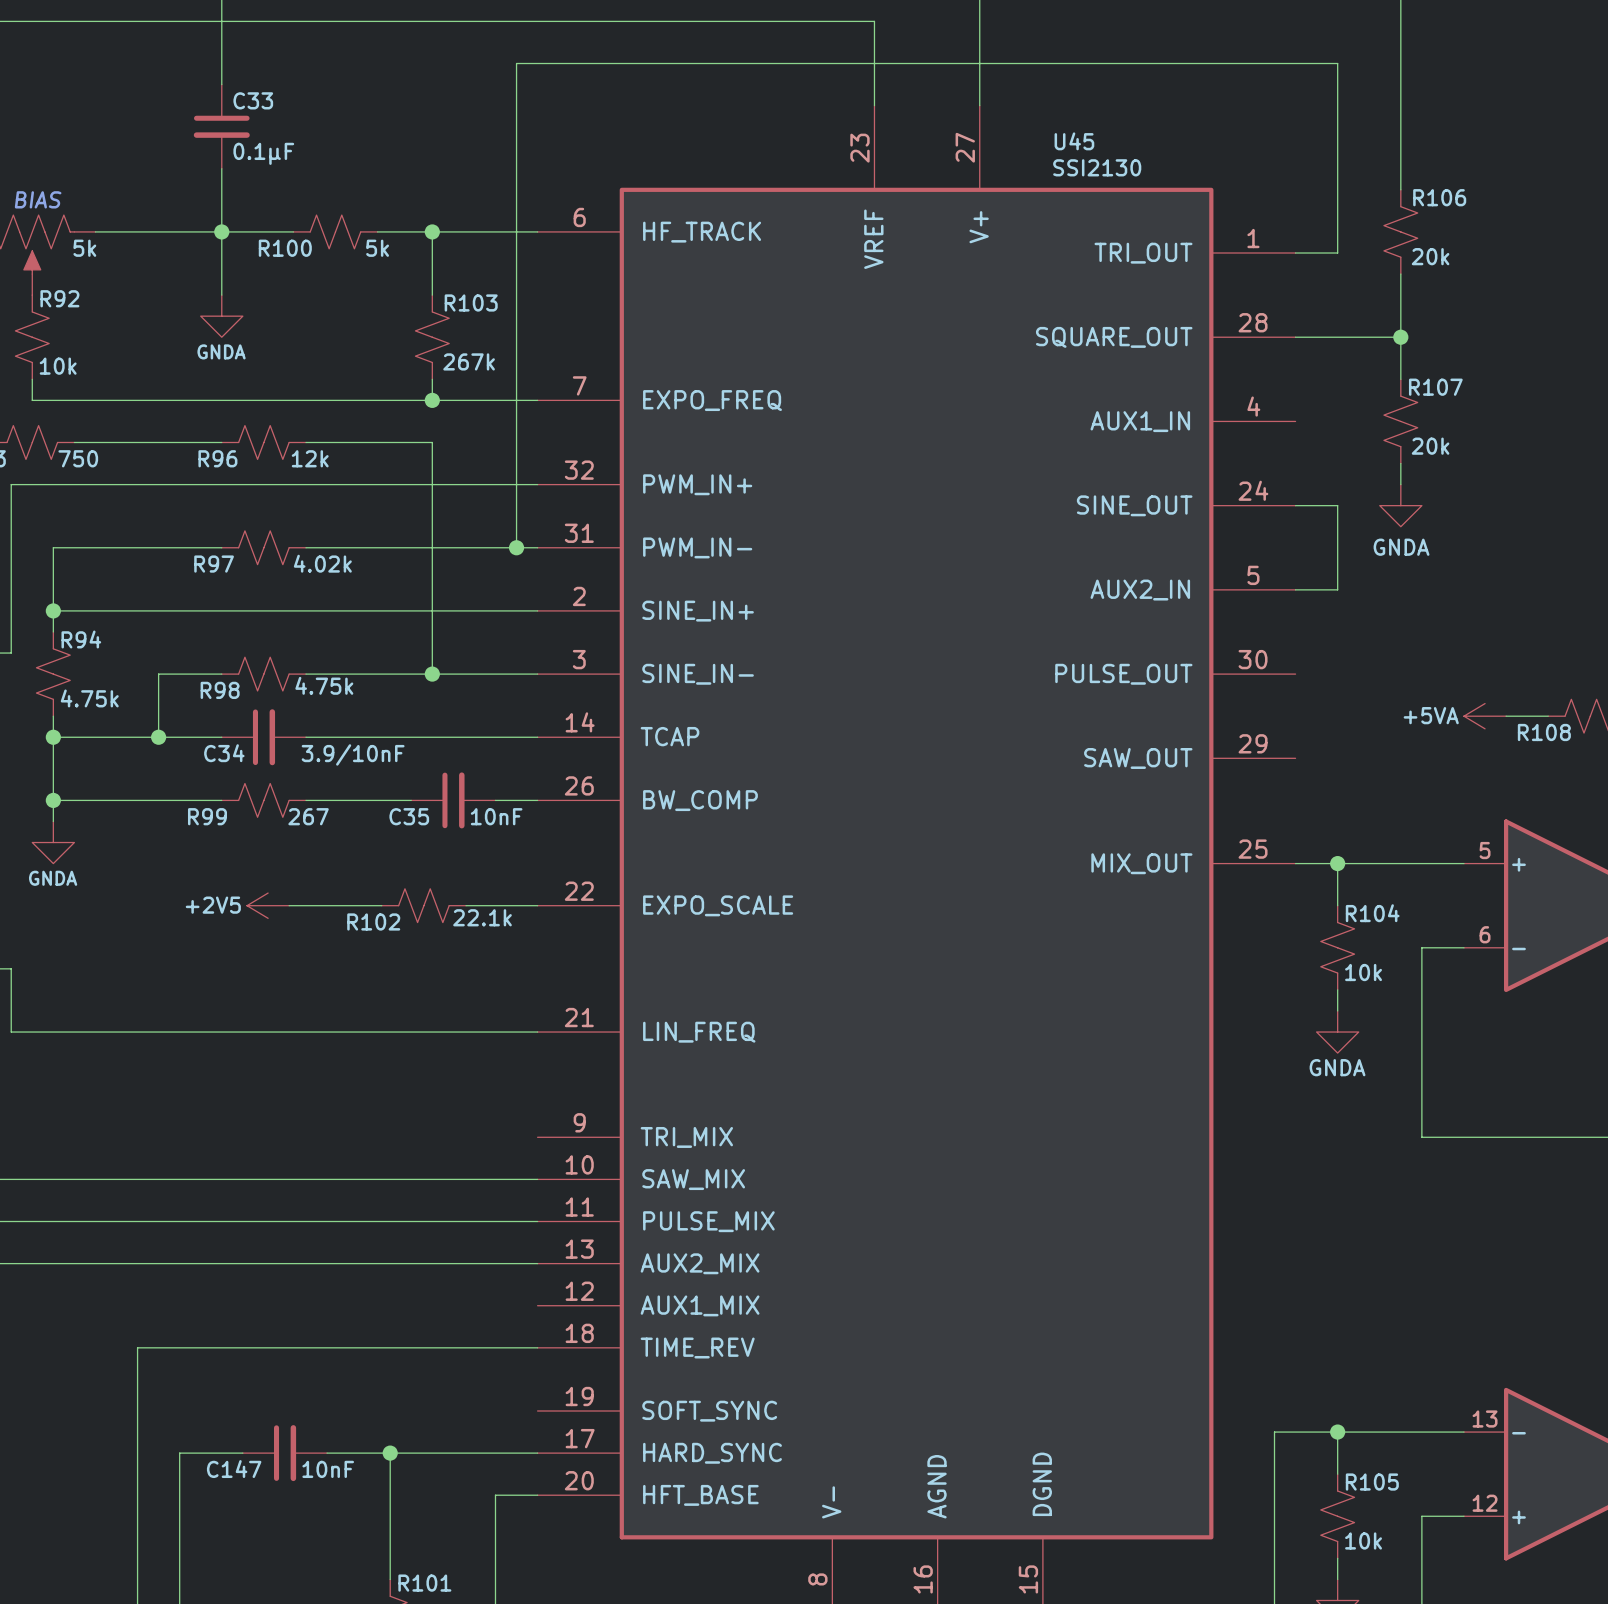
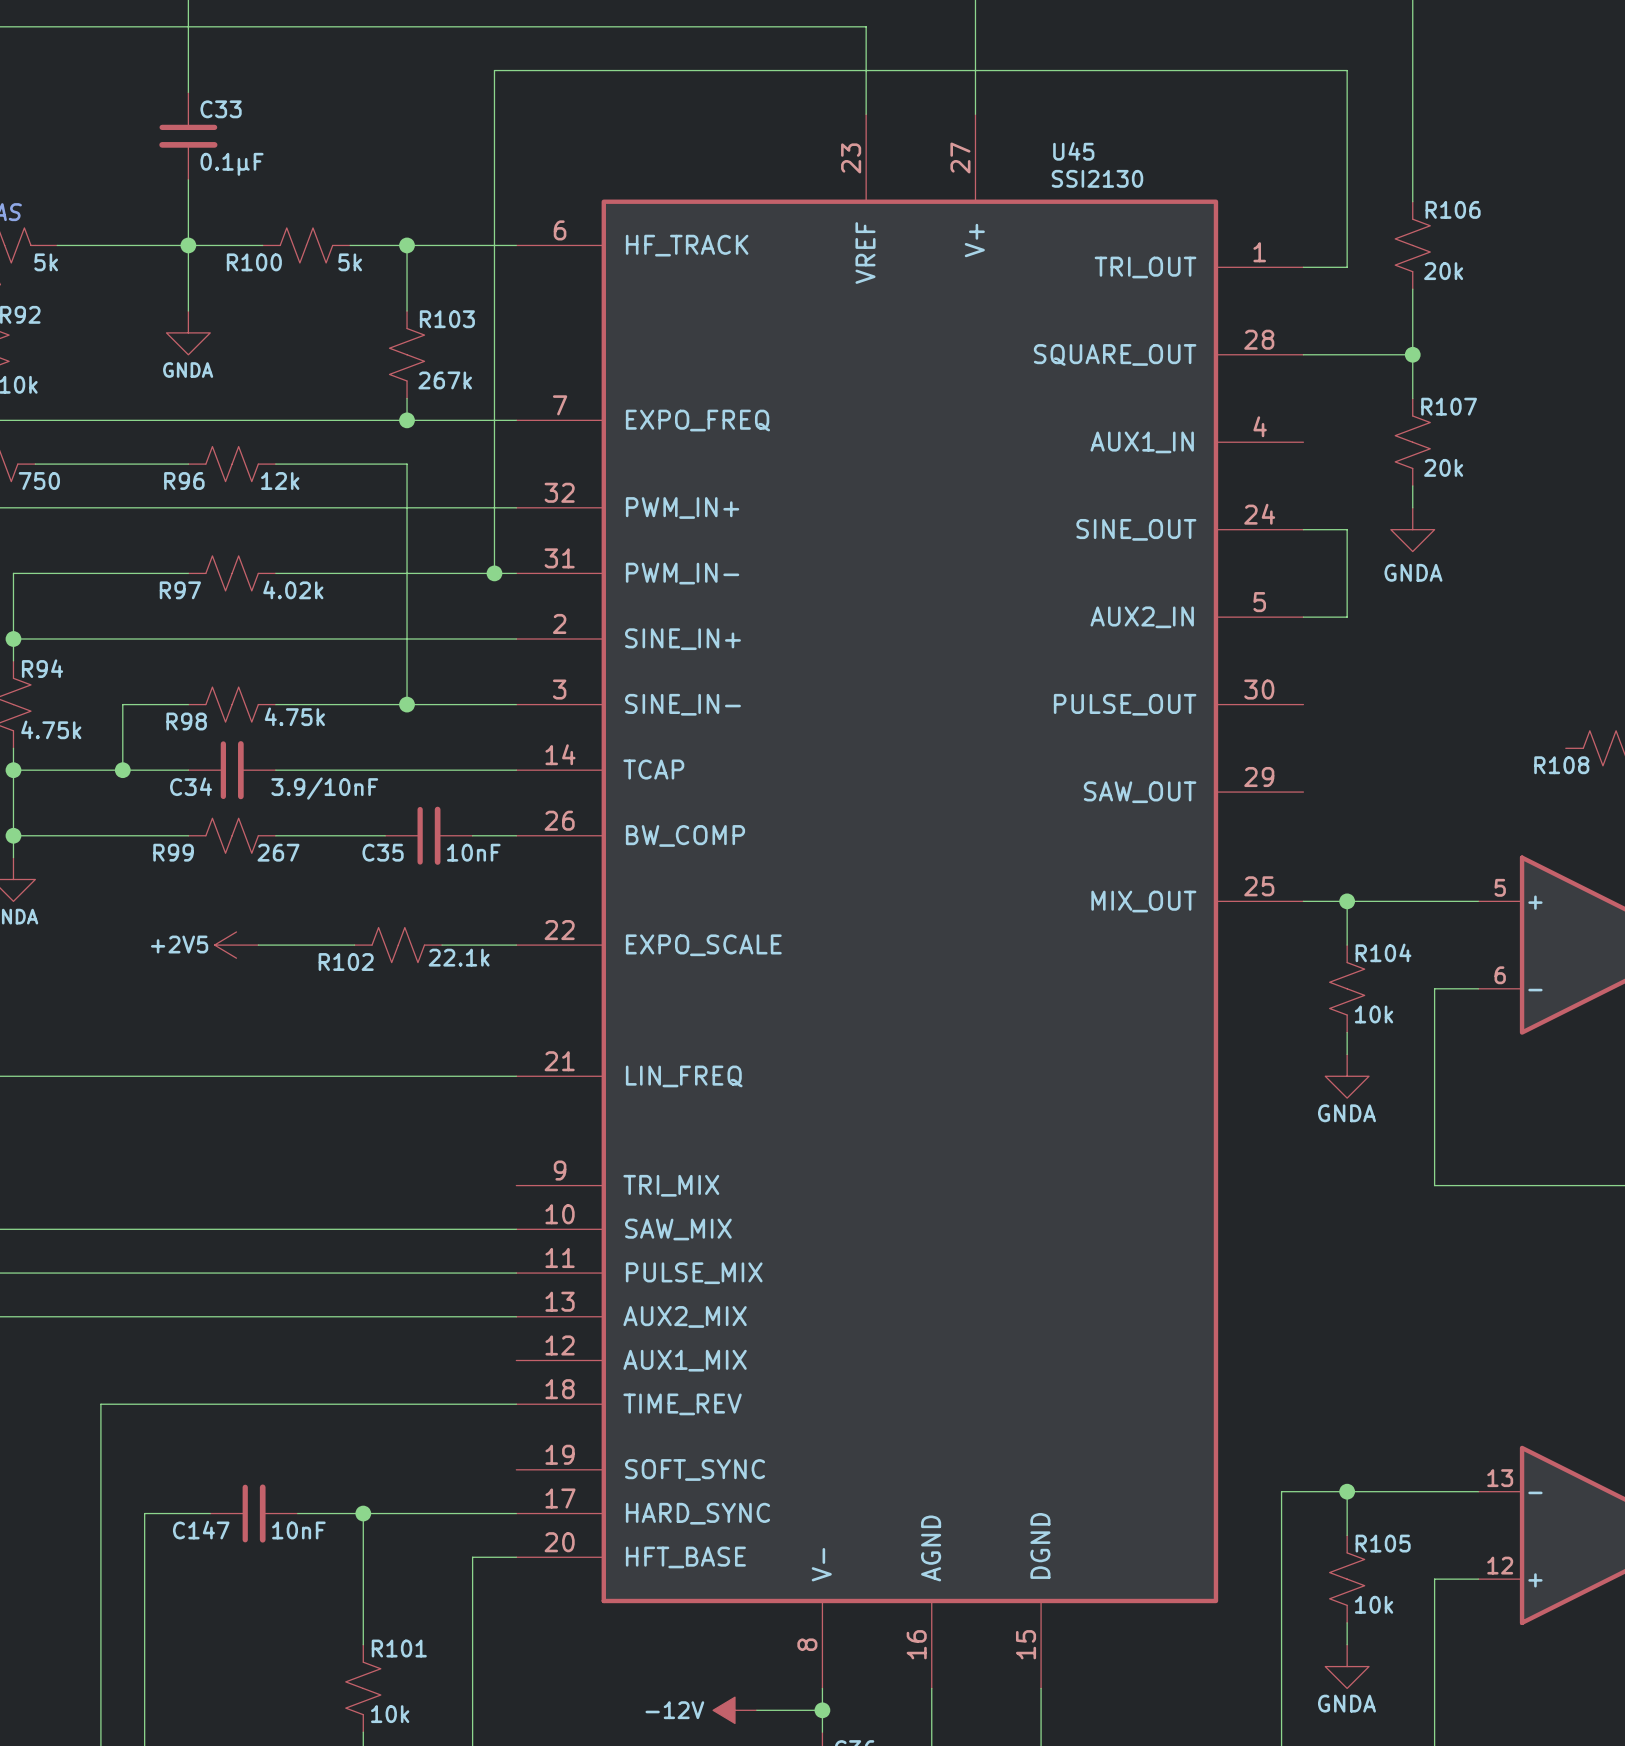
power symbol: +5VA (1485, 716) -> none
wire: (1506, 716) (1548, 716) -> none

